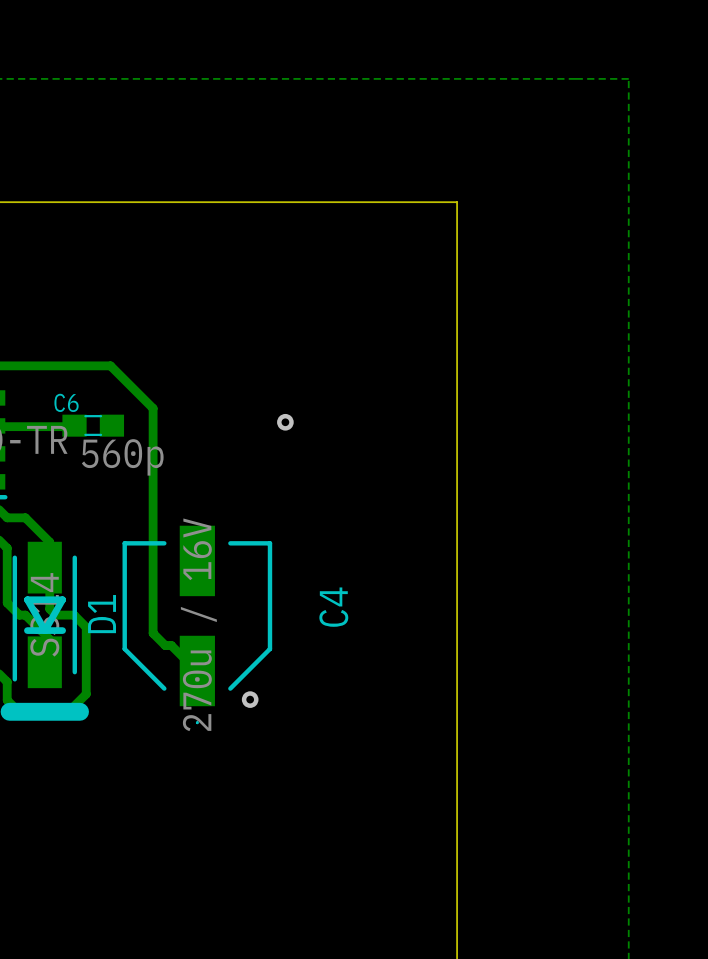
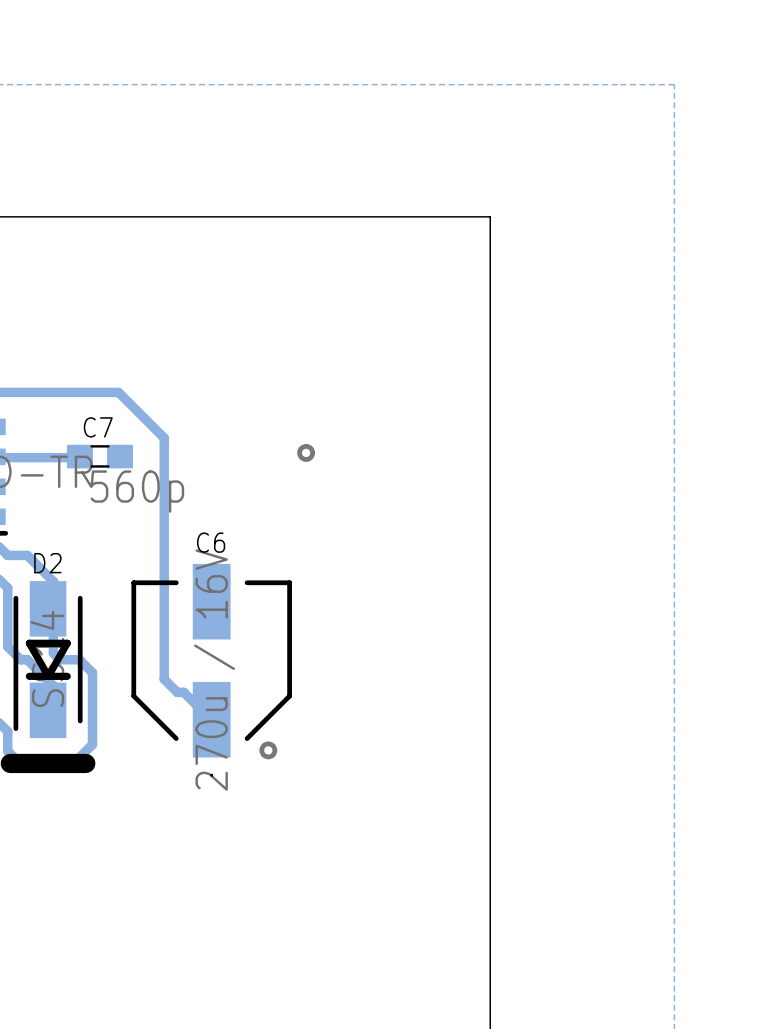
C6 name: C6 (66, 402) -> C7 (98, 427)
C4 name: C4 (333, 607) -> C6 (211, 542)
D1 name: D1 (102, 614) -> D2 (47, 563)

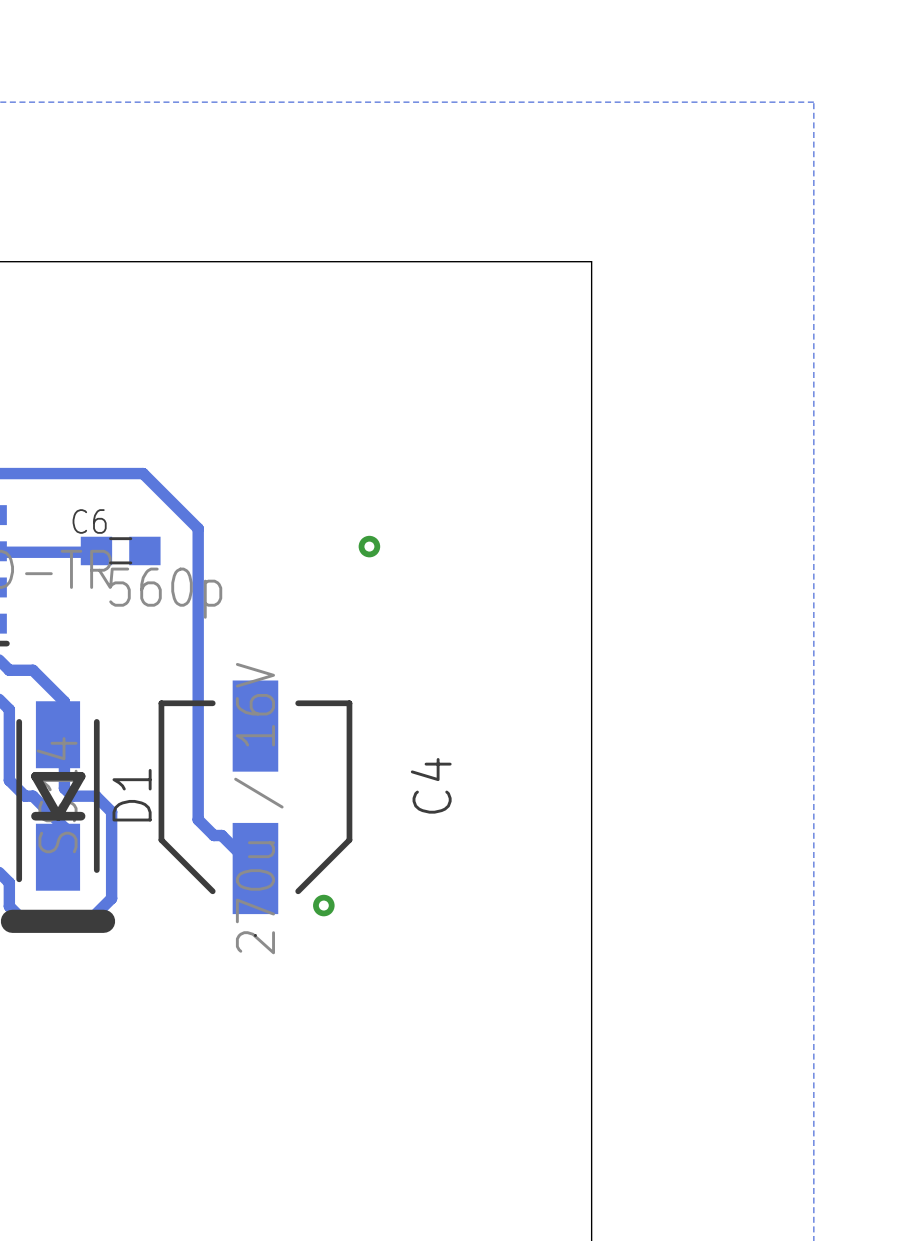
C7 name: C7 (98, 427) -> C6 (89, 521)
C6 name: C6 (211, 542) -> C4 (431, 785)
D2 name: D2 (47, 563) -> D1 (132, 795)

